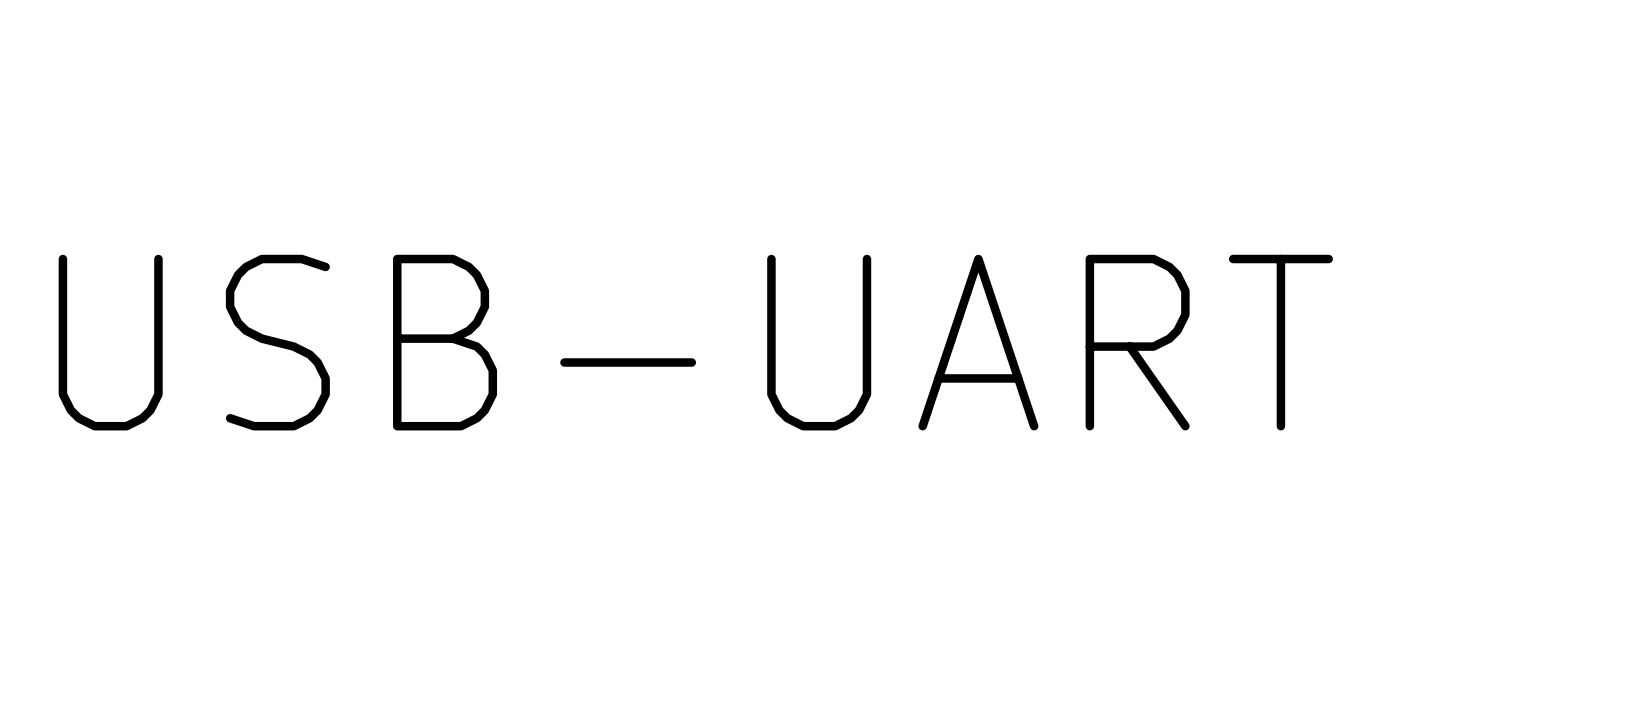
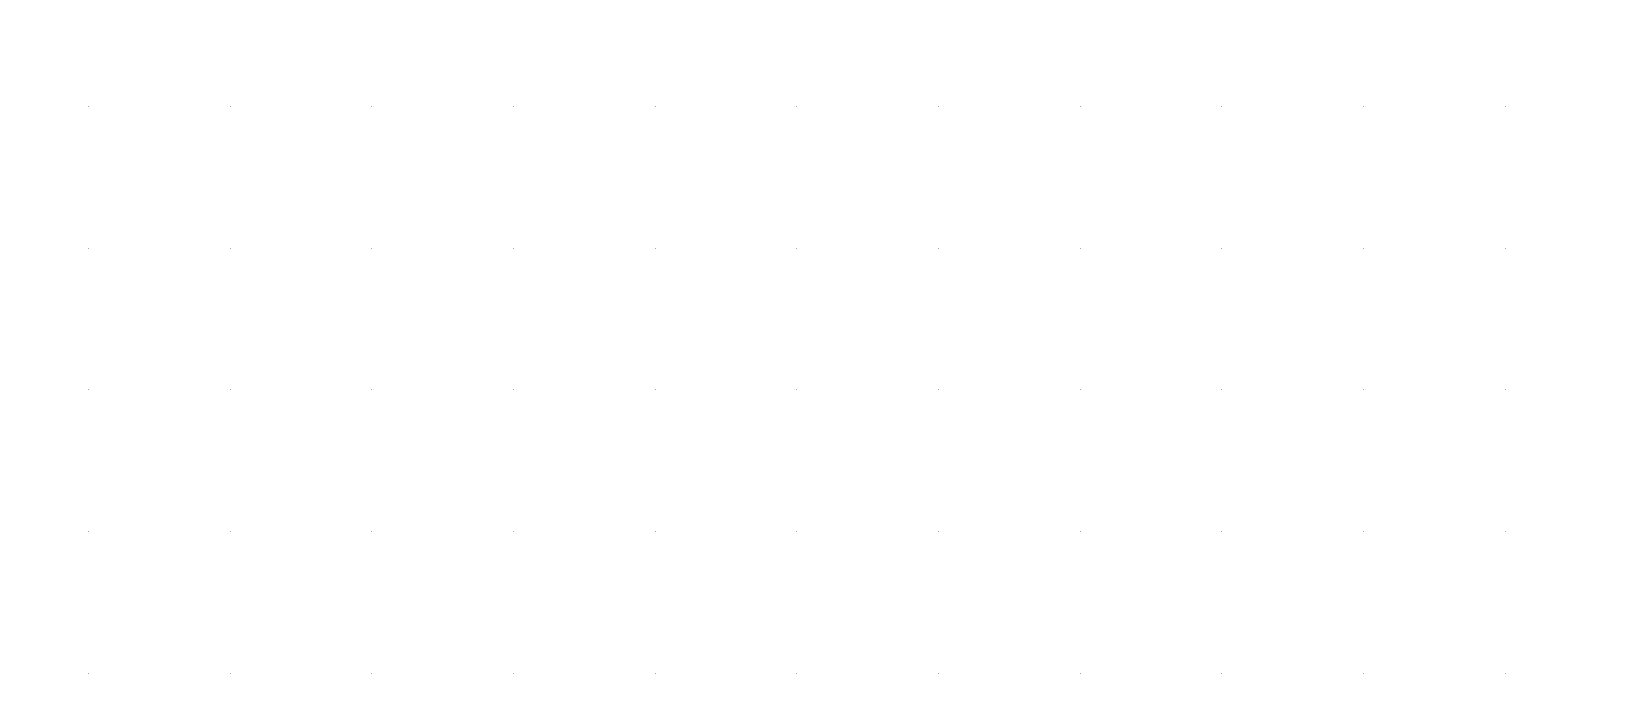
text: USB-UART (695, 342) -> none

